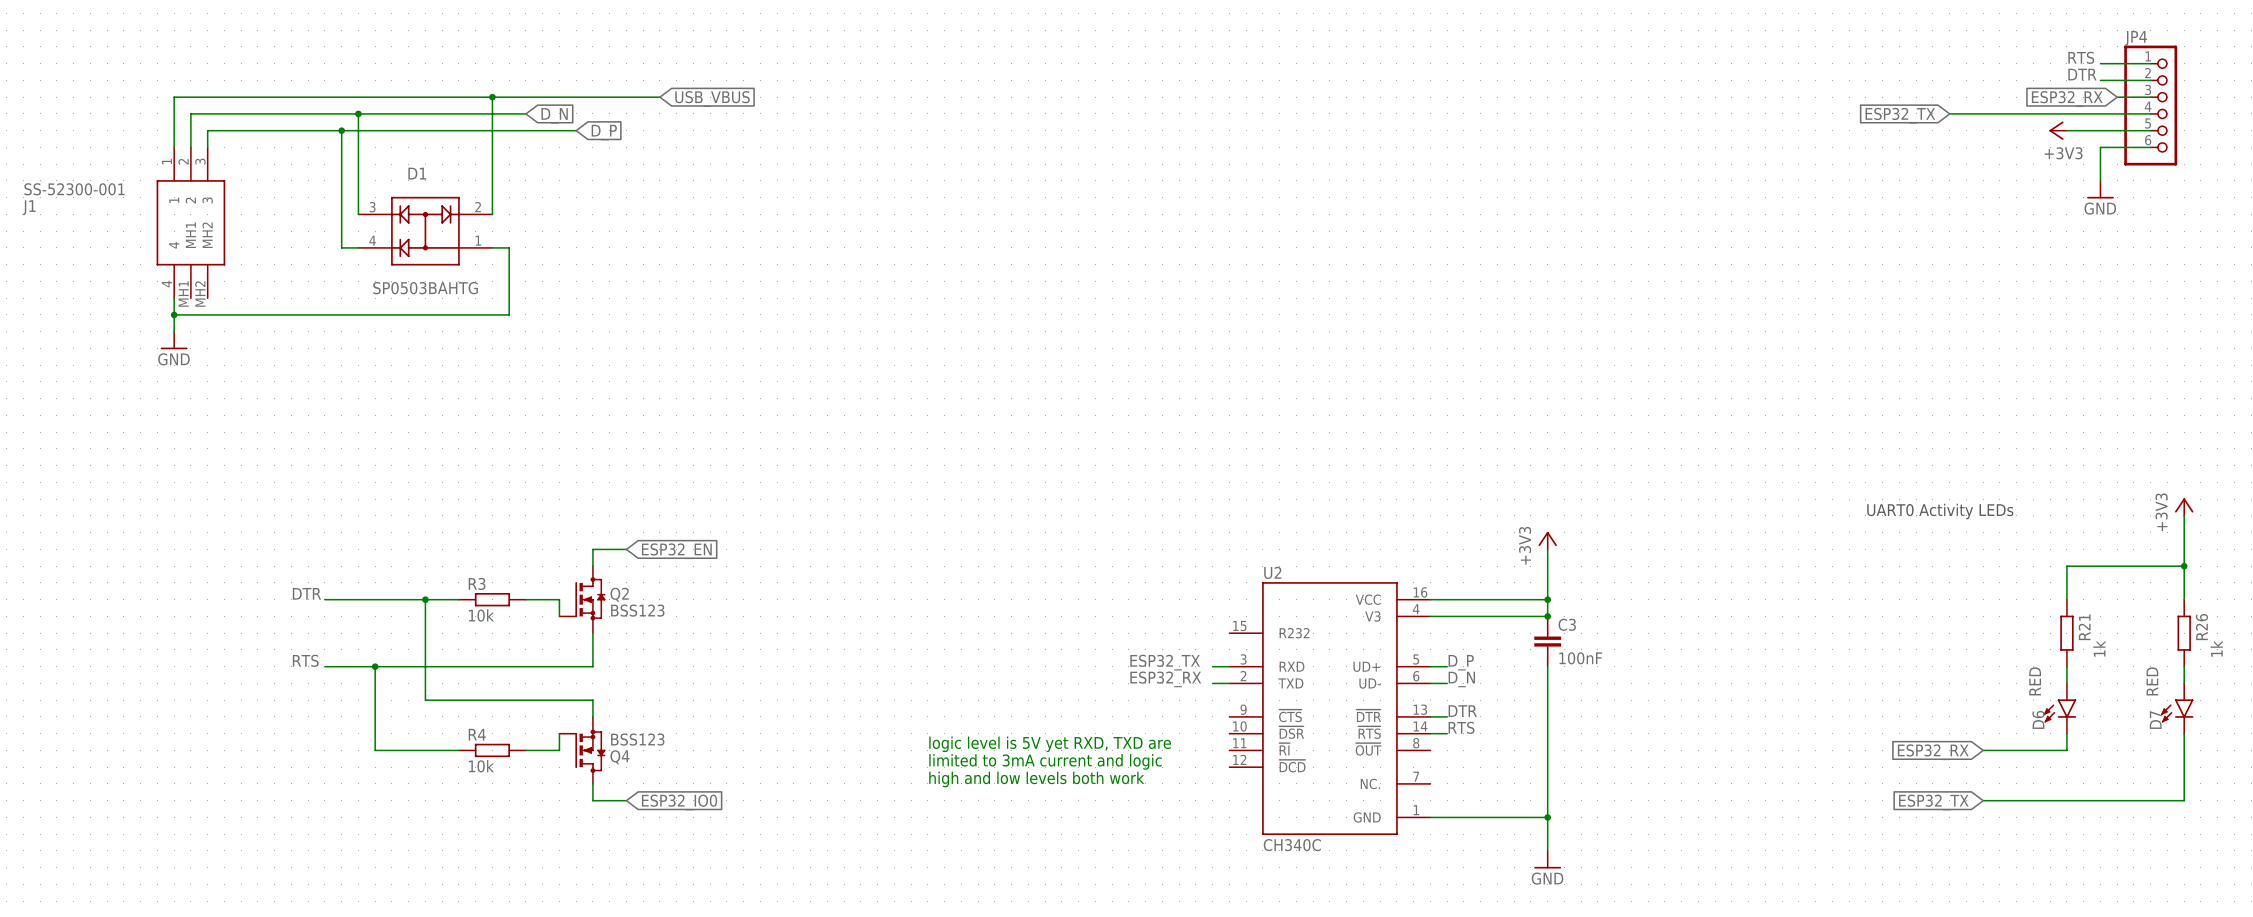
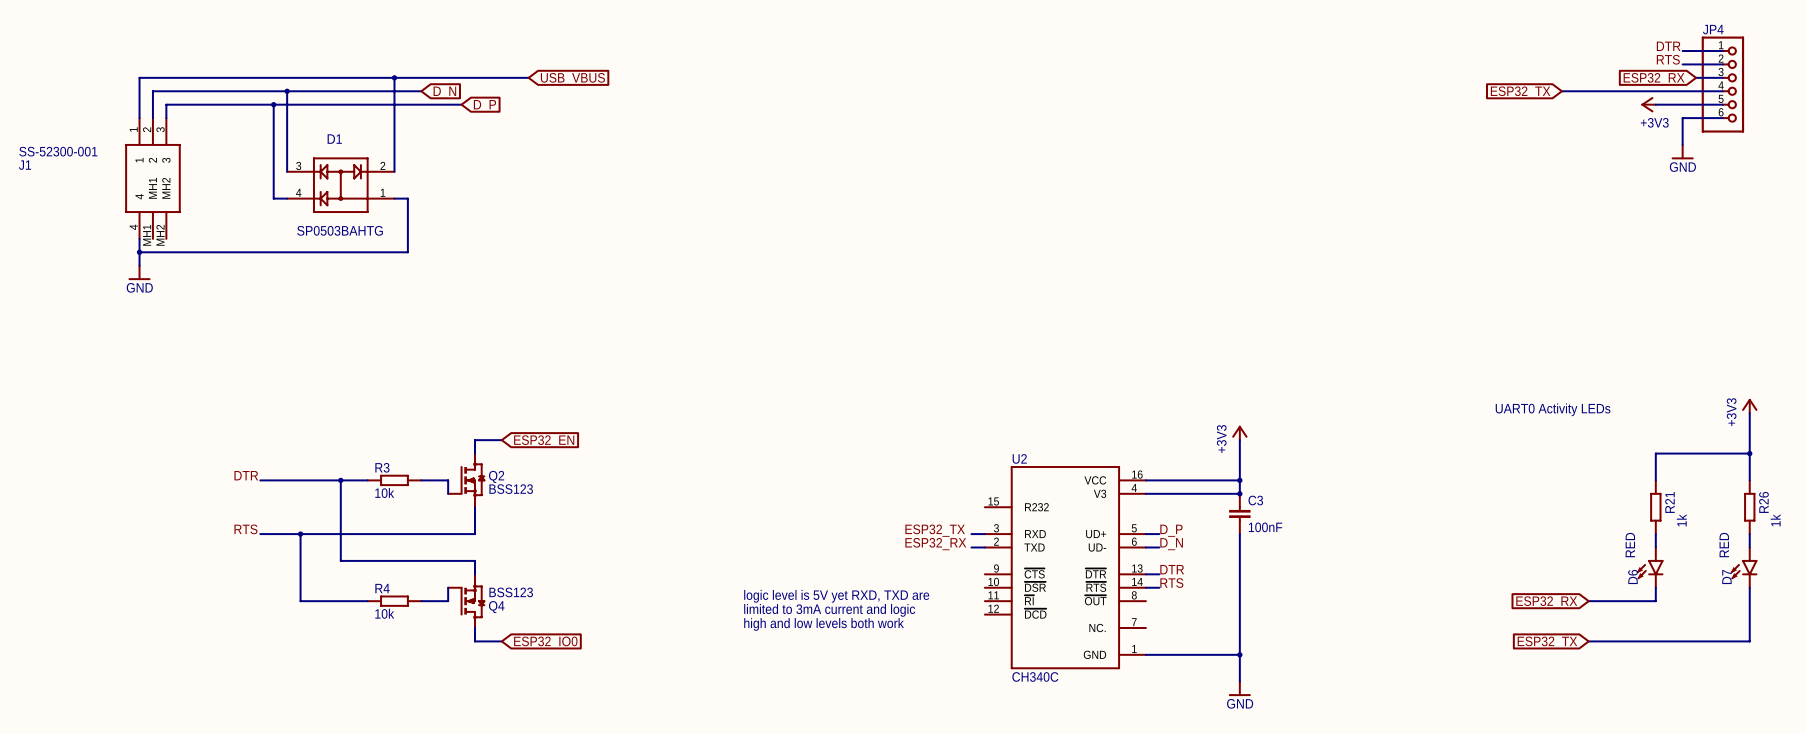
label: RTS (2081, 57) -> DTR (1668, 46)
label: DTR (2082, 74) -> RTS (1668, 59)

